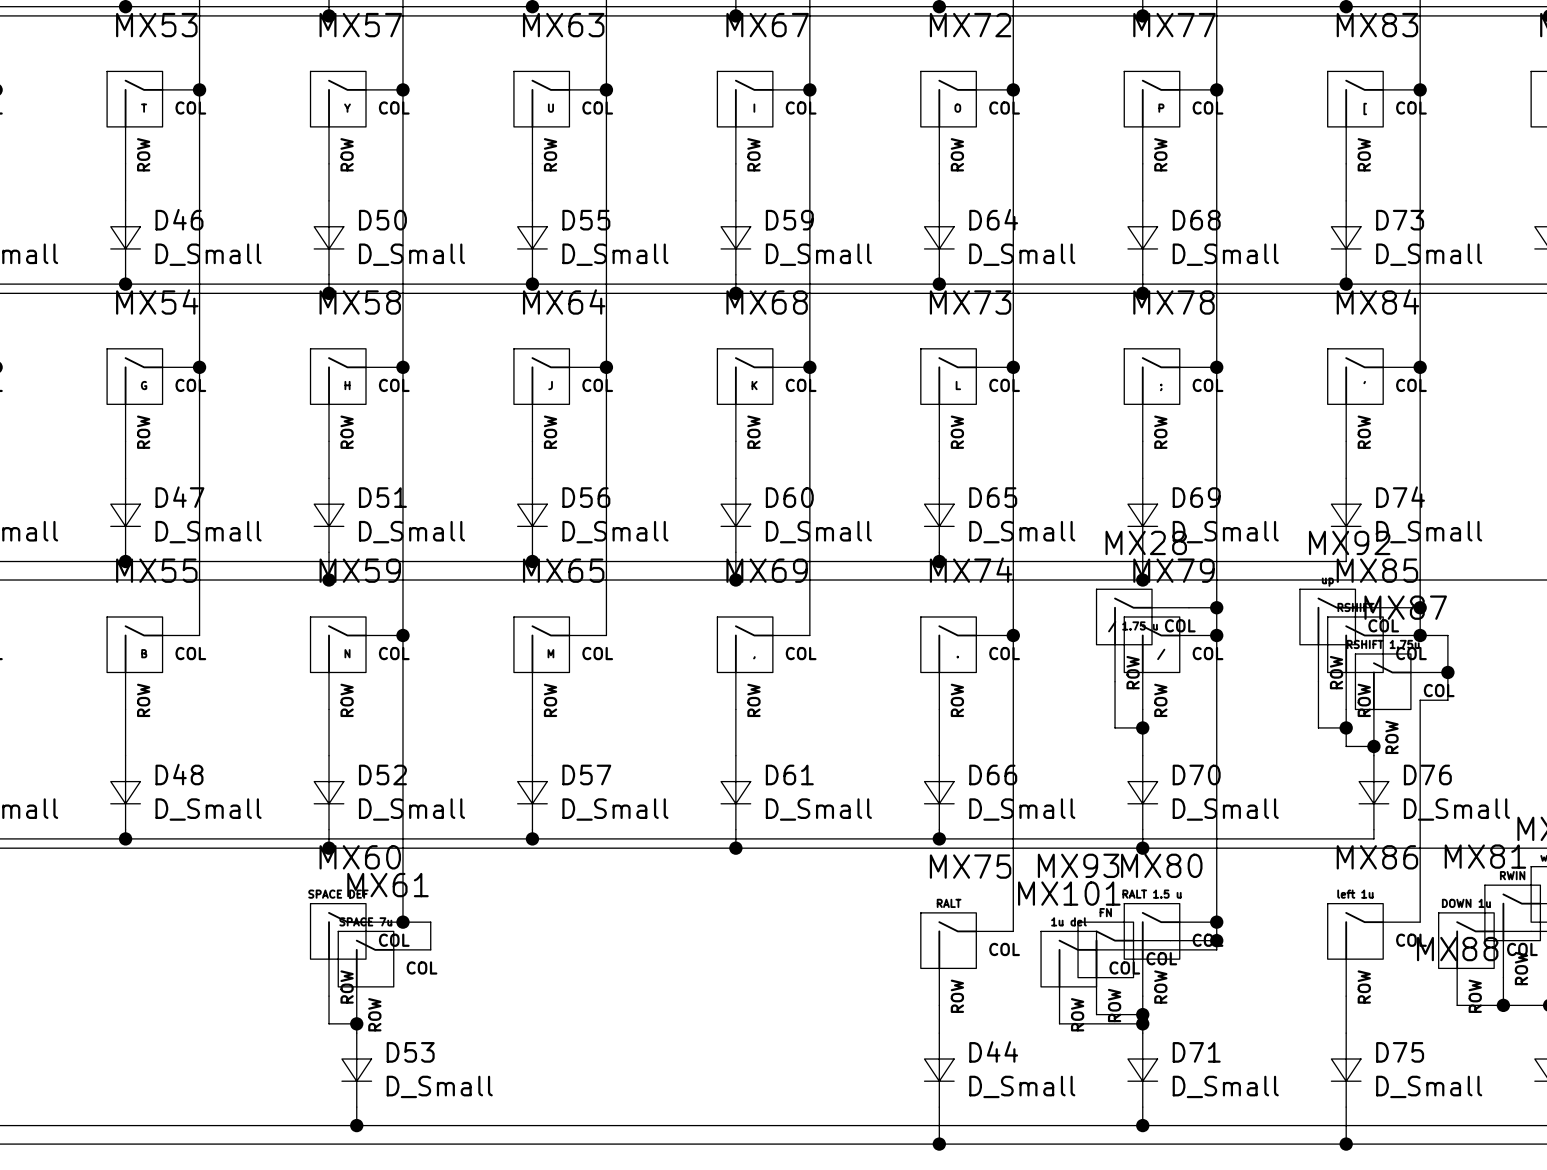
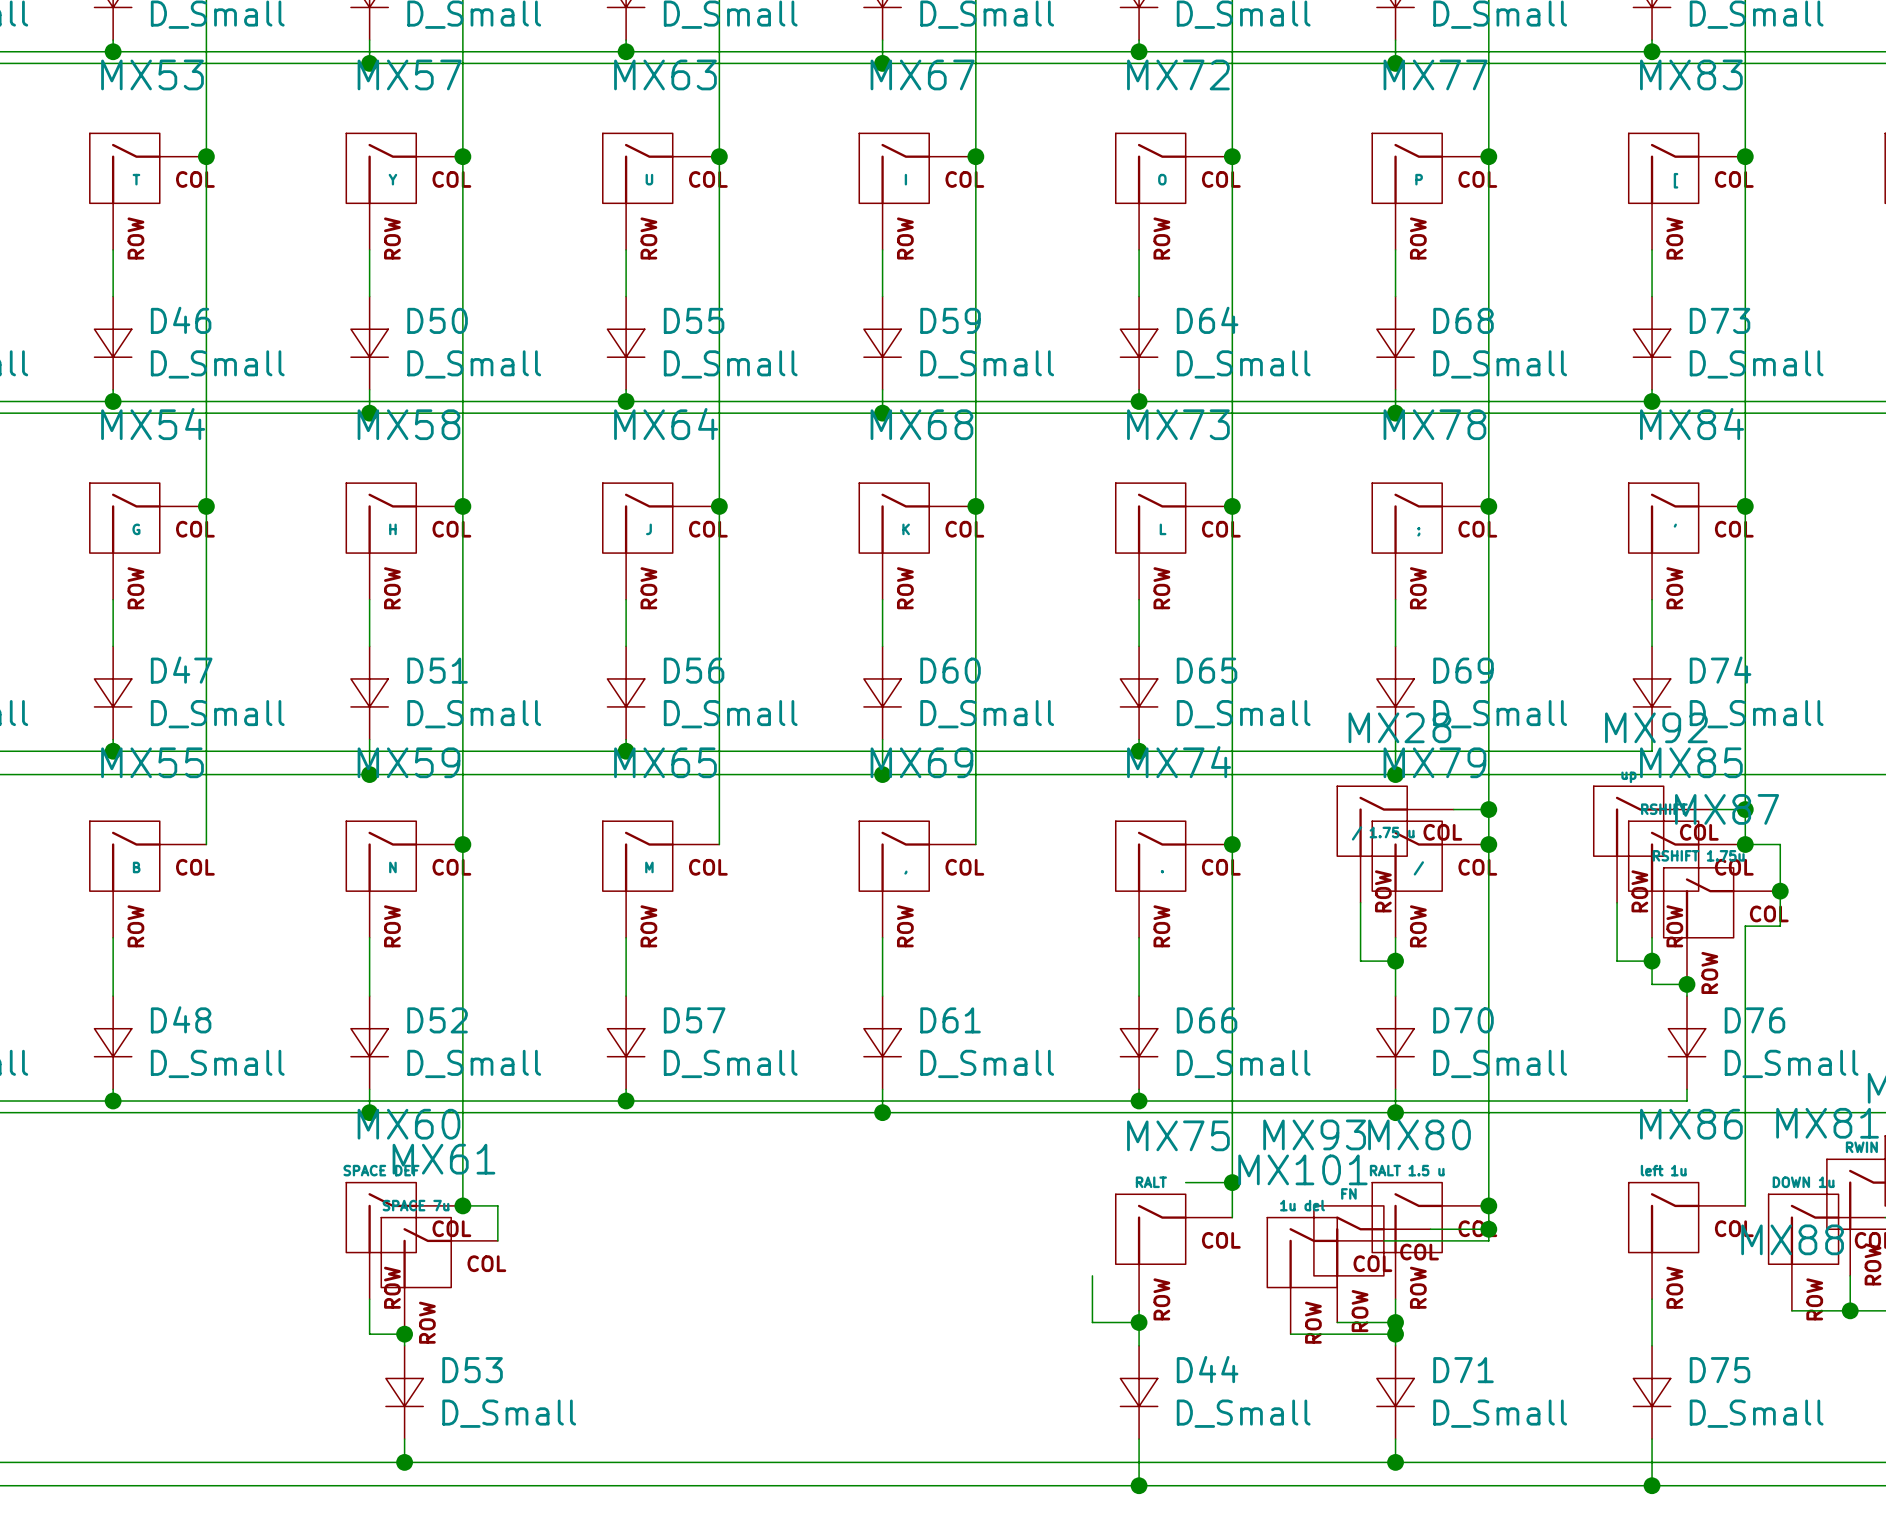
wire: none -> (1185, 1182) (1232, 1182)
junction: none -> (1232, 1182)
wire: none -> (1092, 1275) (1092, 1322) (1139, 1322)
junction: none -> (1139, 1322)

